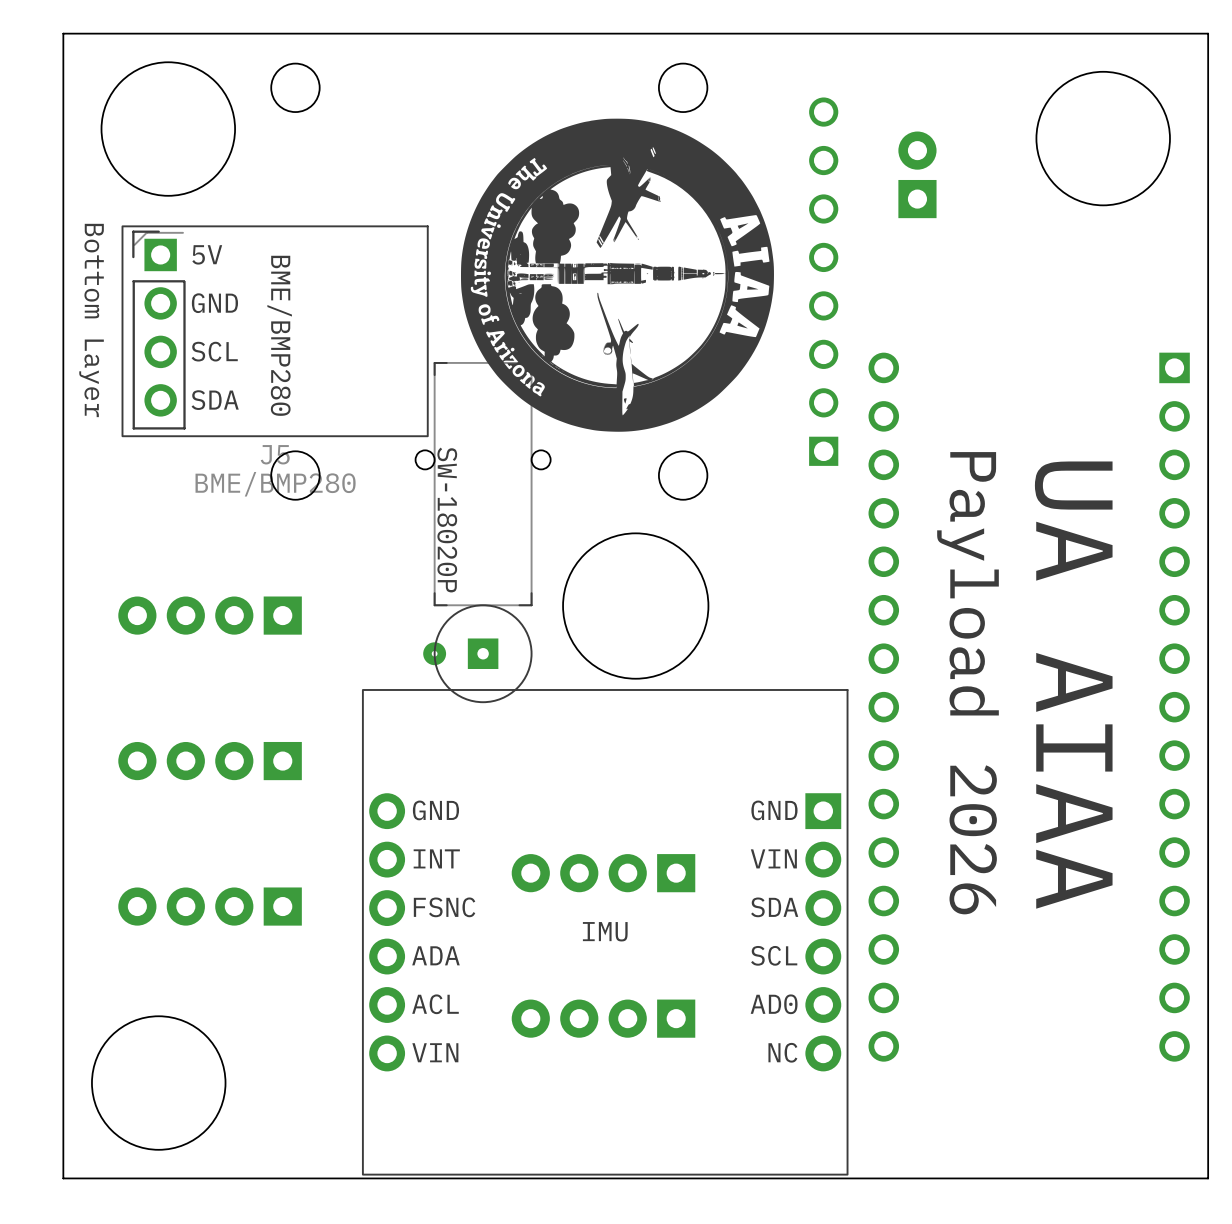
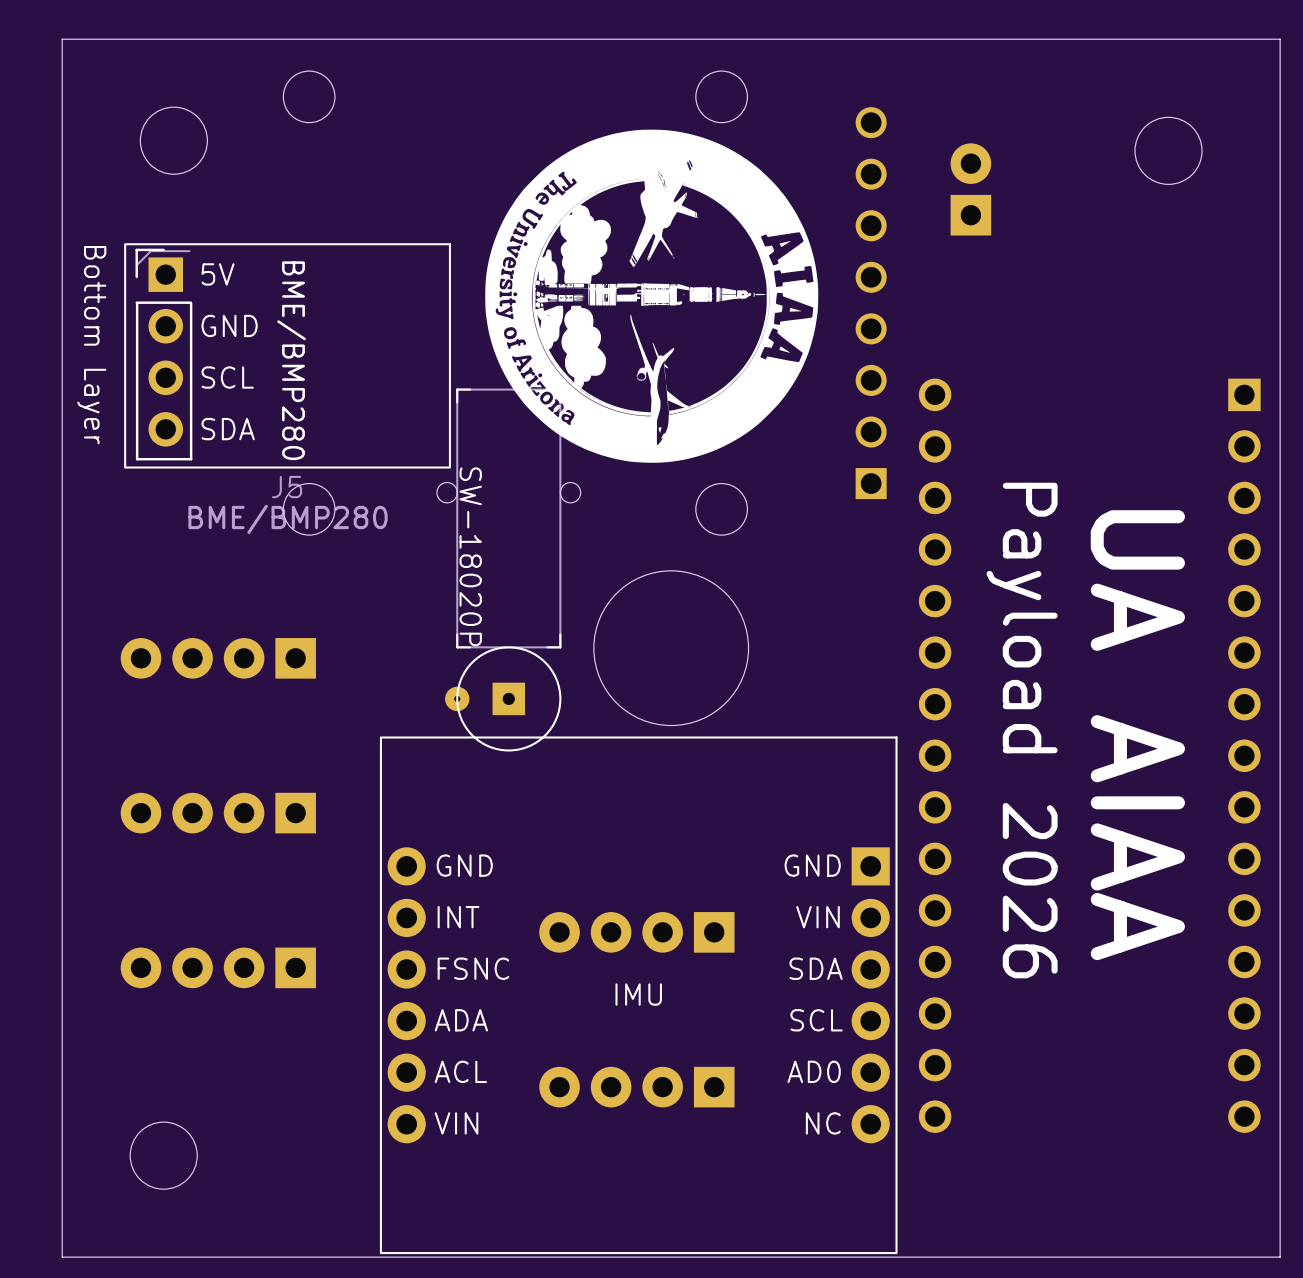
round board edge size: [101, 61, 236, 197] -> [139, 106, 208, 175]
round board edge size: [1035, 71, 1171, 206] -> [1134, 116, 1203, 185]
round board edge size: [91, 1015, 227, 1151] -> [129, 1121, 198, 1190]

